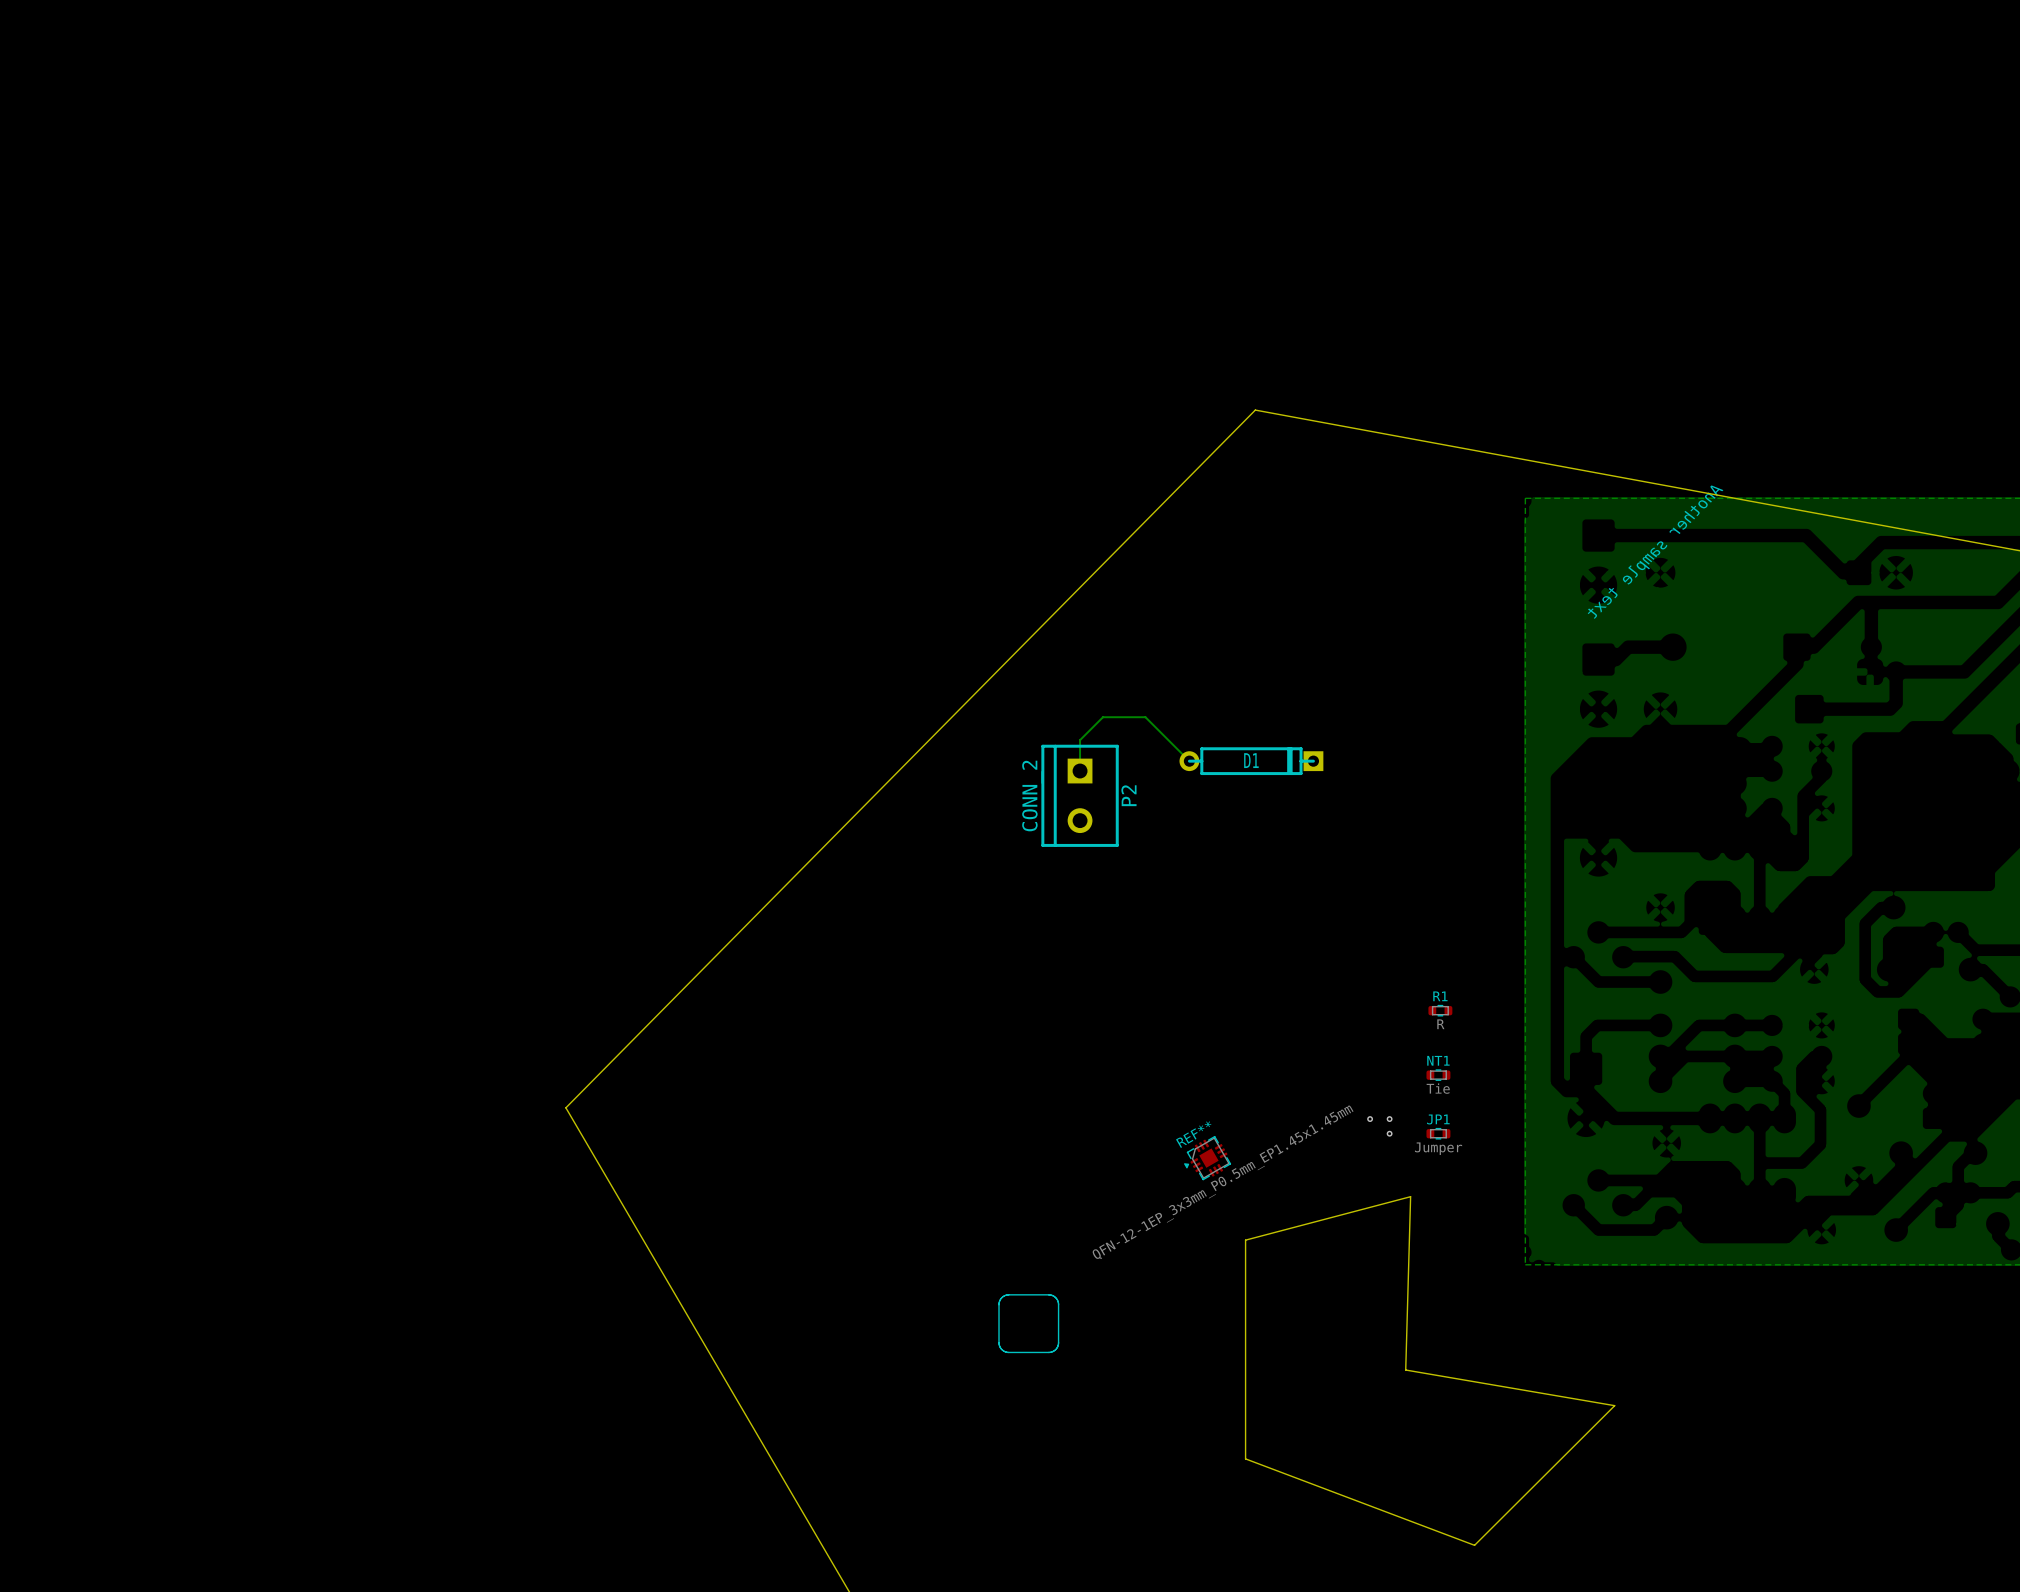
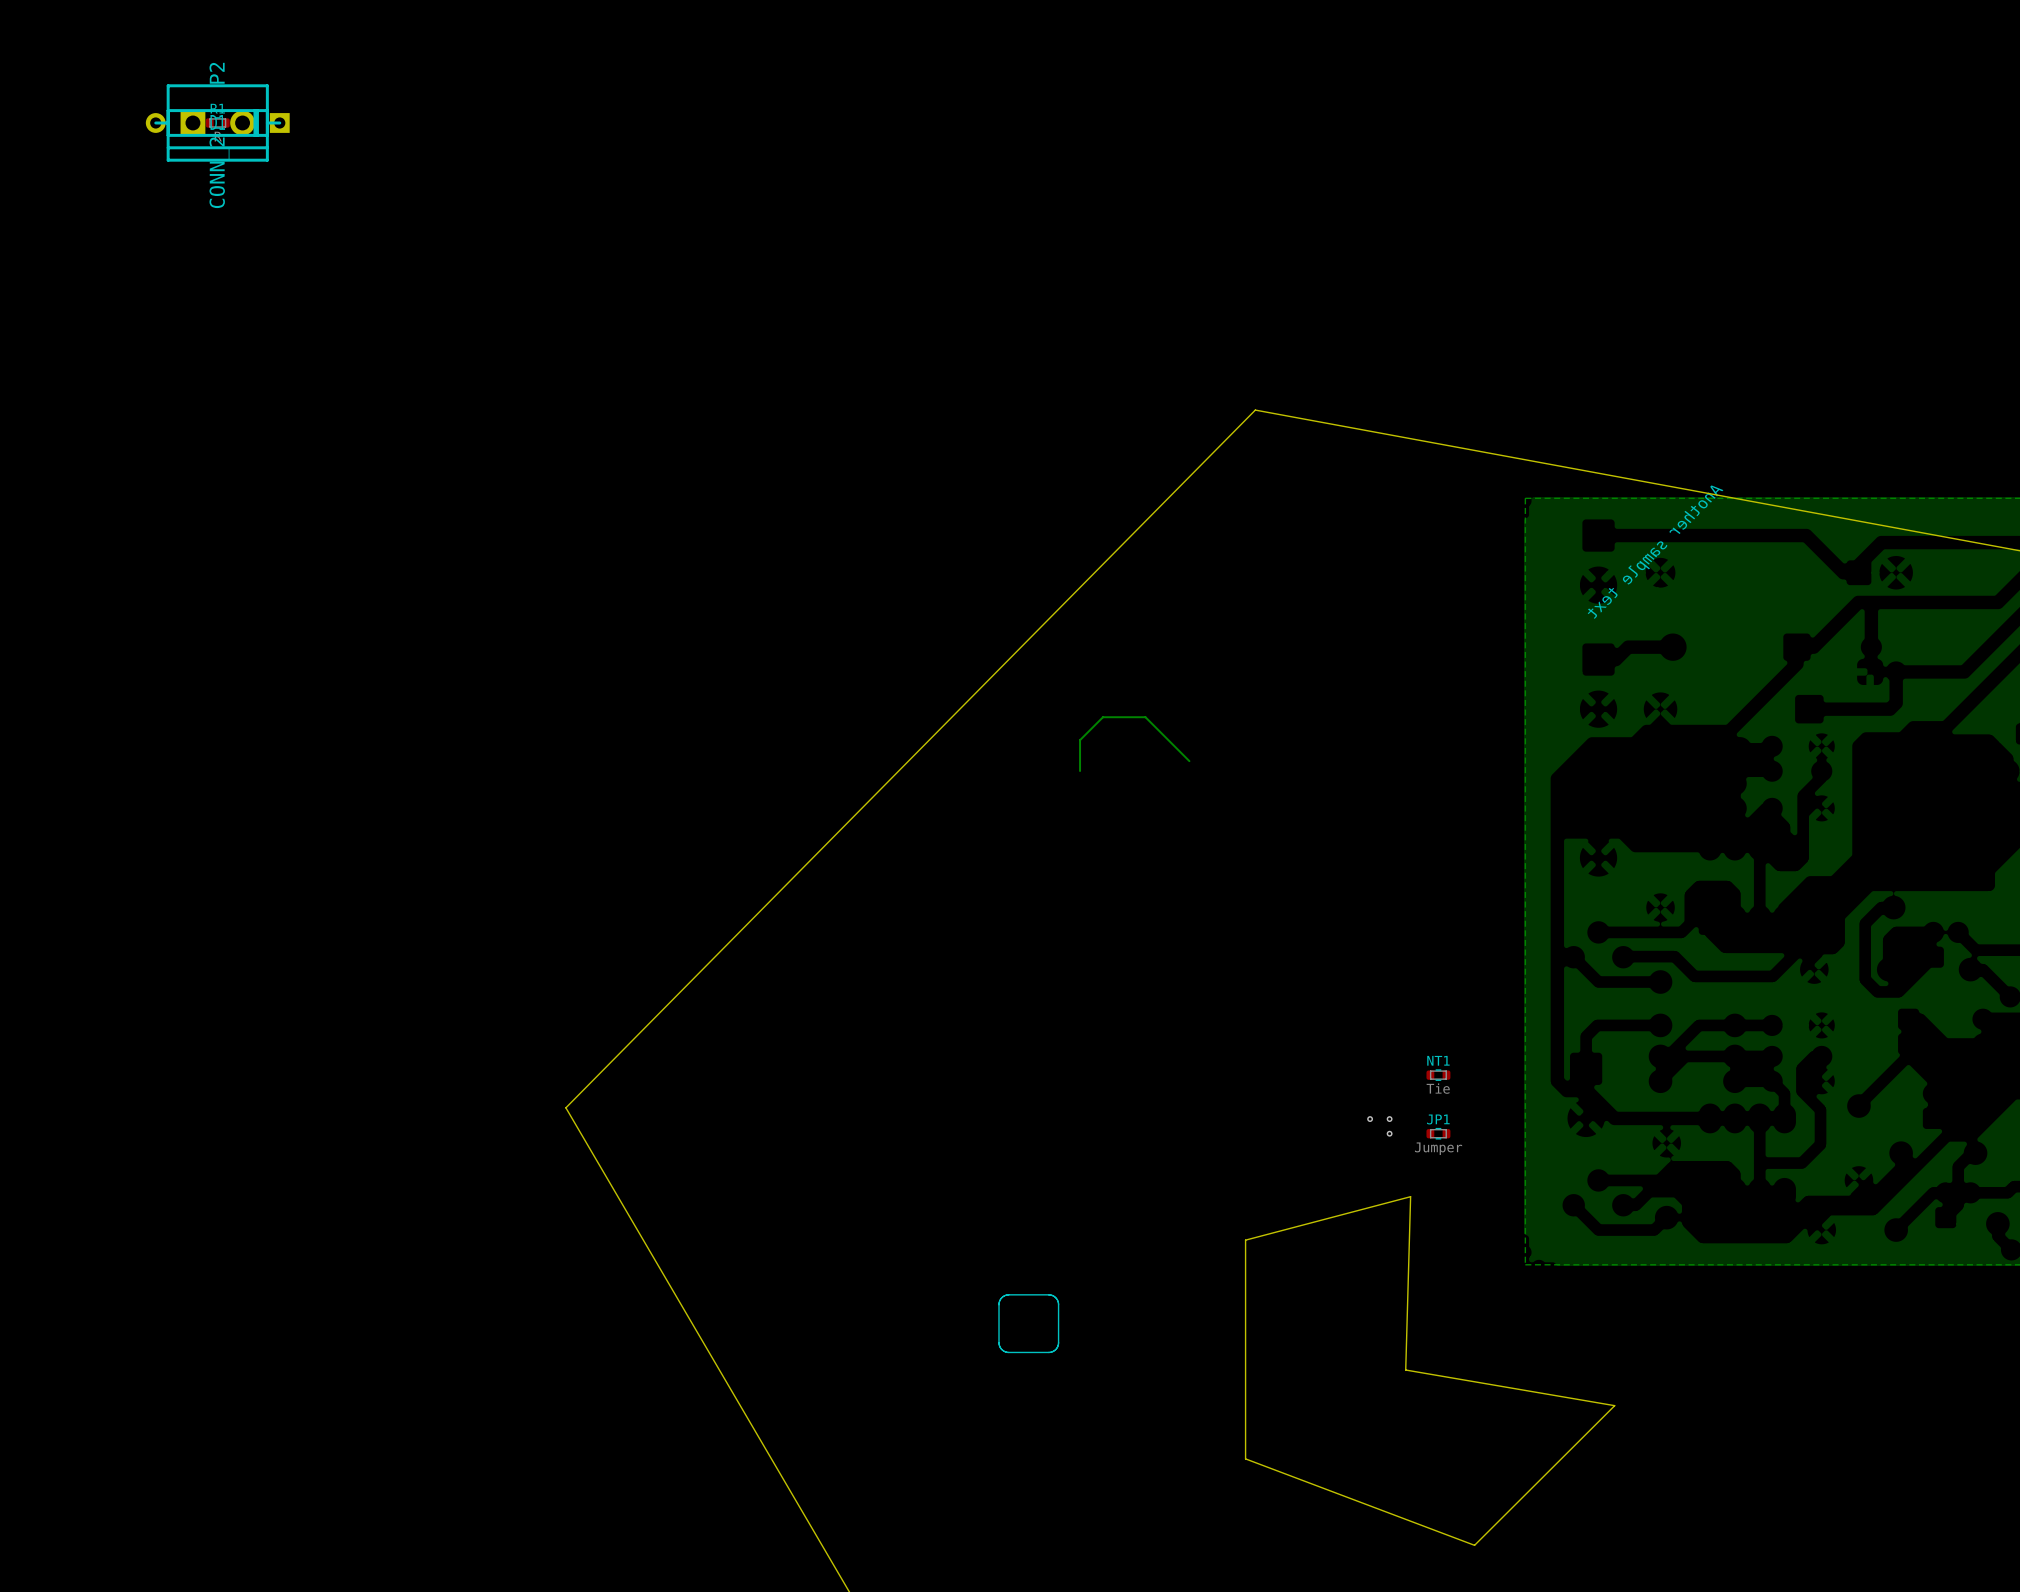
D1 position: (1251, 761) -> (217, 122)
P2 rotation: 0° (1080, 795) -> 90° counterclockwise (217, 122)
P2 position: (1080, 795) -> (217, 122)
R1 position: (1440, 1010) -> (217, 122)
REF**: QFN-12-1EP_3x3mm_P0.5mm_EP1.45x1.45mm (1207, 1158) -> none

